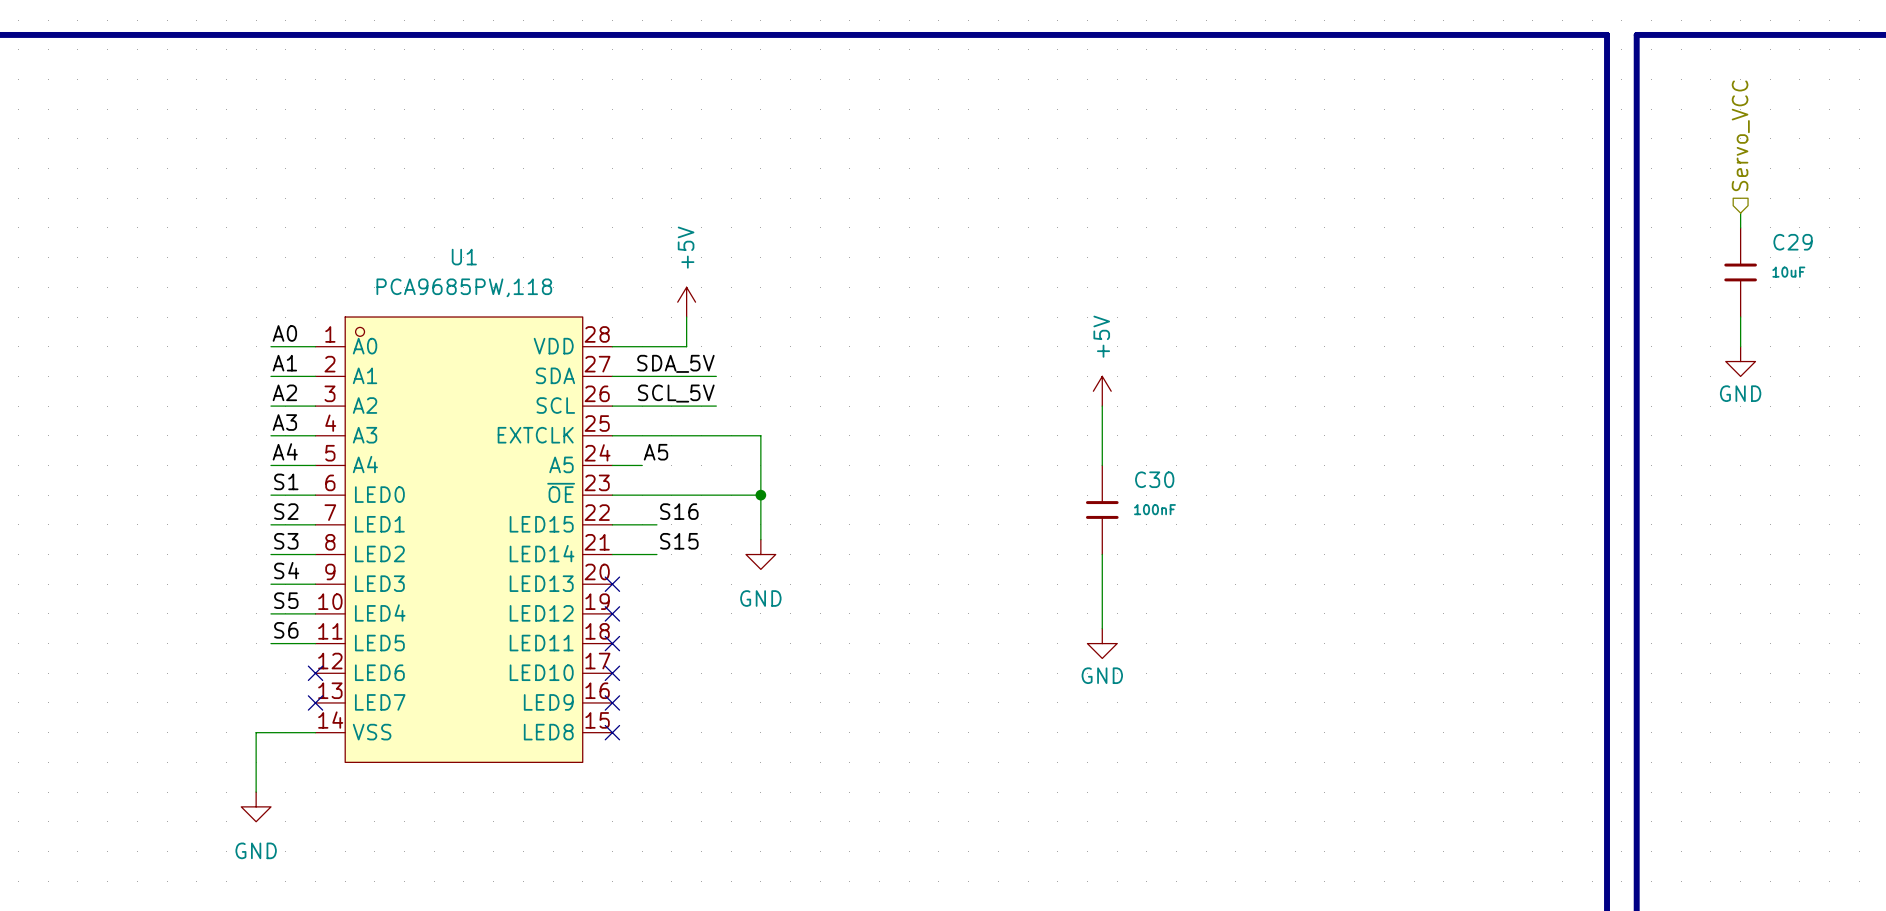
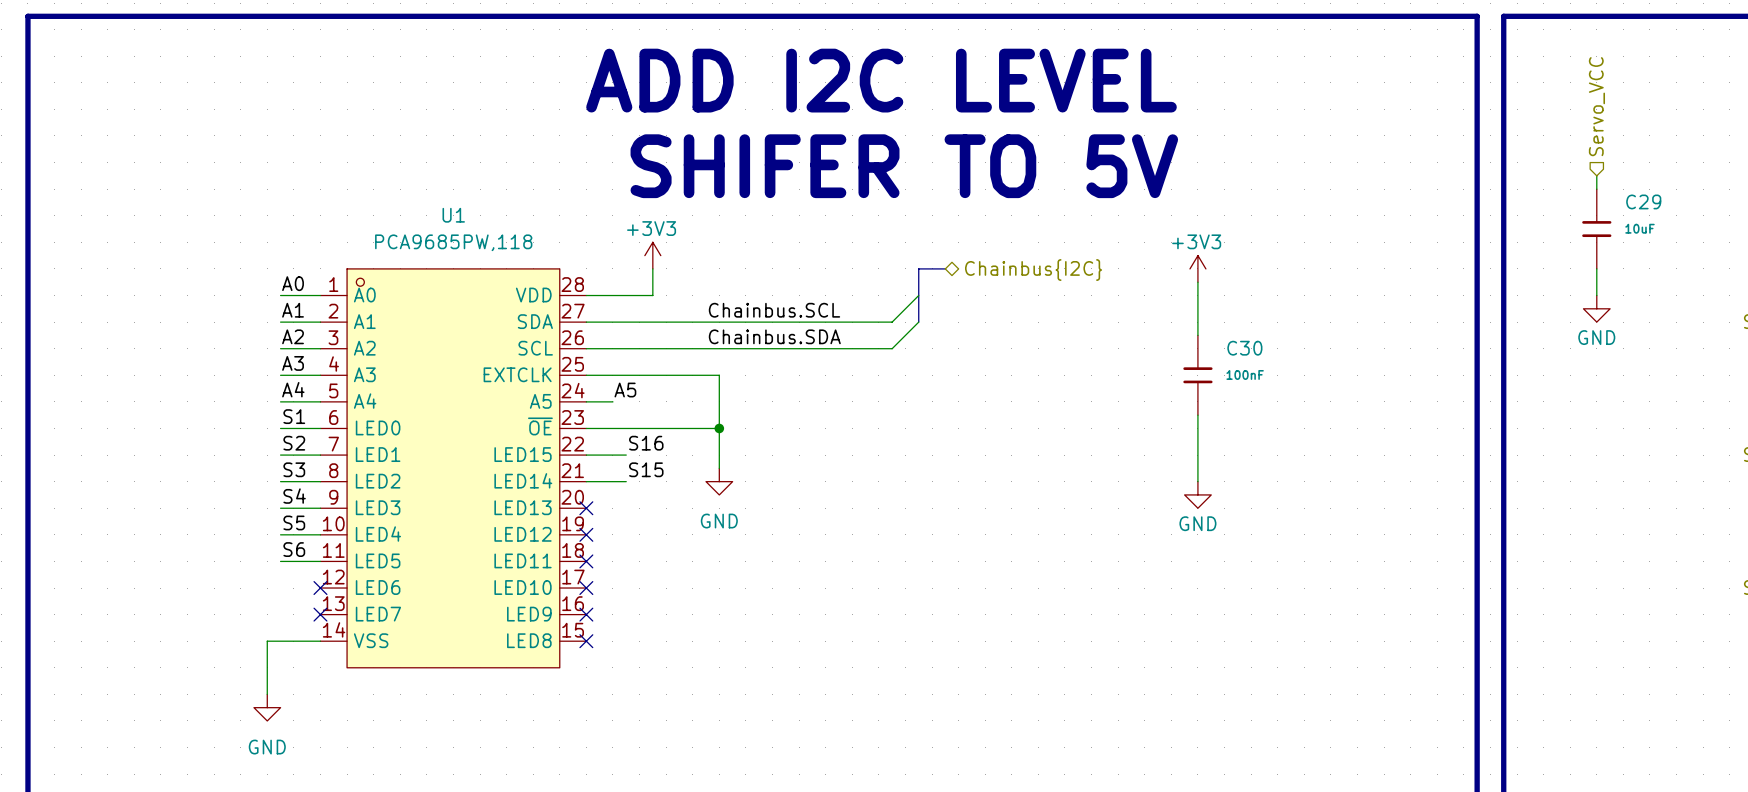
text: none -> ADD I2C LEVEL (881, 80)
text: none -> SHIFER TO 5V (904, 166)
power symbol: +5V (686, 302) -> +3V3 (652, 255)
bus: none -> (945, 268) (918, 268) (918, 322)
power symbol: none -> +3V3 (1197, 268)
hierarchical label: none -> Chainbus{I2C} (1033, 270)
wire: none -> (918, 295) (892, 322) (679, 322)
label: SDA_5V (675, 363) -> none
label: none -> Chainbus.SCL (774, 310)
wire: none -> (918, 322) (892, 348) (679, 348)
power symbol: +5V (1102, 391) -> none
label: none -> Chainbus.SDA (774, 336)
label: SCL_5V (676, 393) -> none
wire: (1102, 406) (1102, 465) -> (1197, 282) (1197, 335)
C30 position: (1102, 509) -> (1197, 375)
wire: (1102, 554) (1102, 628) -> (1197, 415) (1197, 481)
power symbol position: GND (1102, 643) -> GND (1197, 494)

